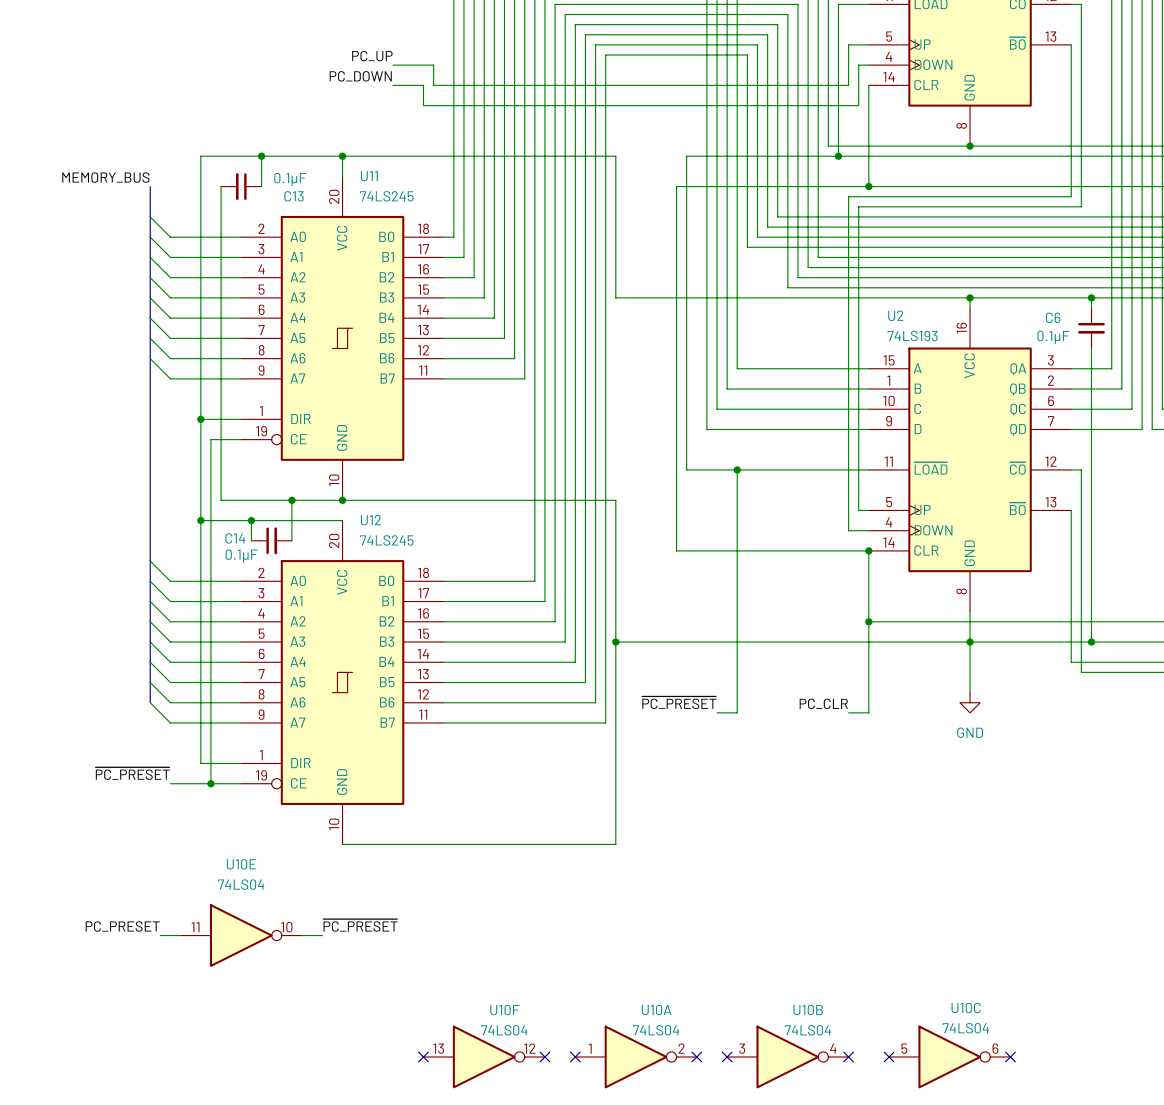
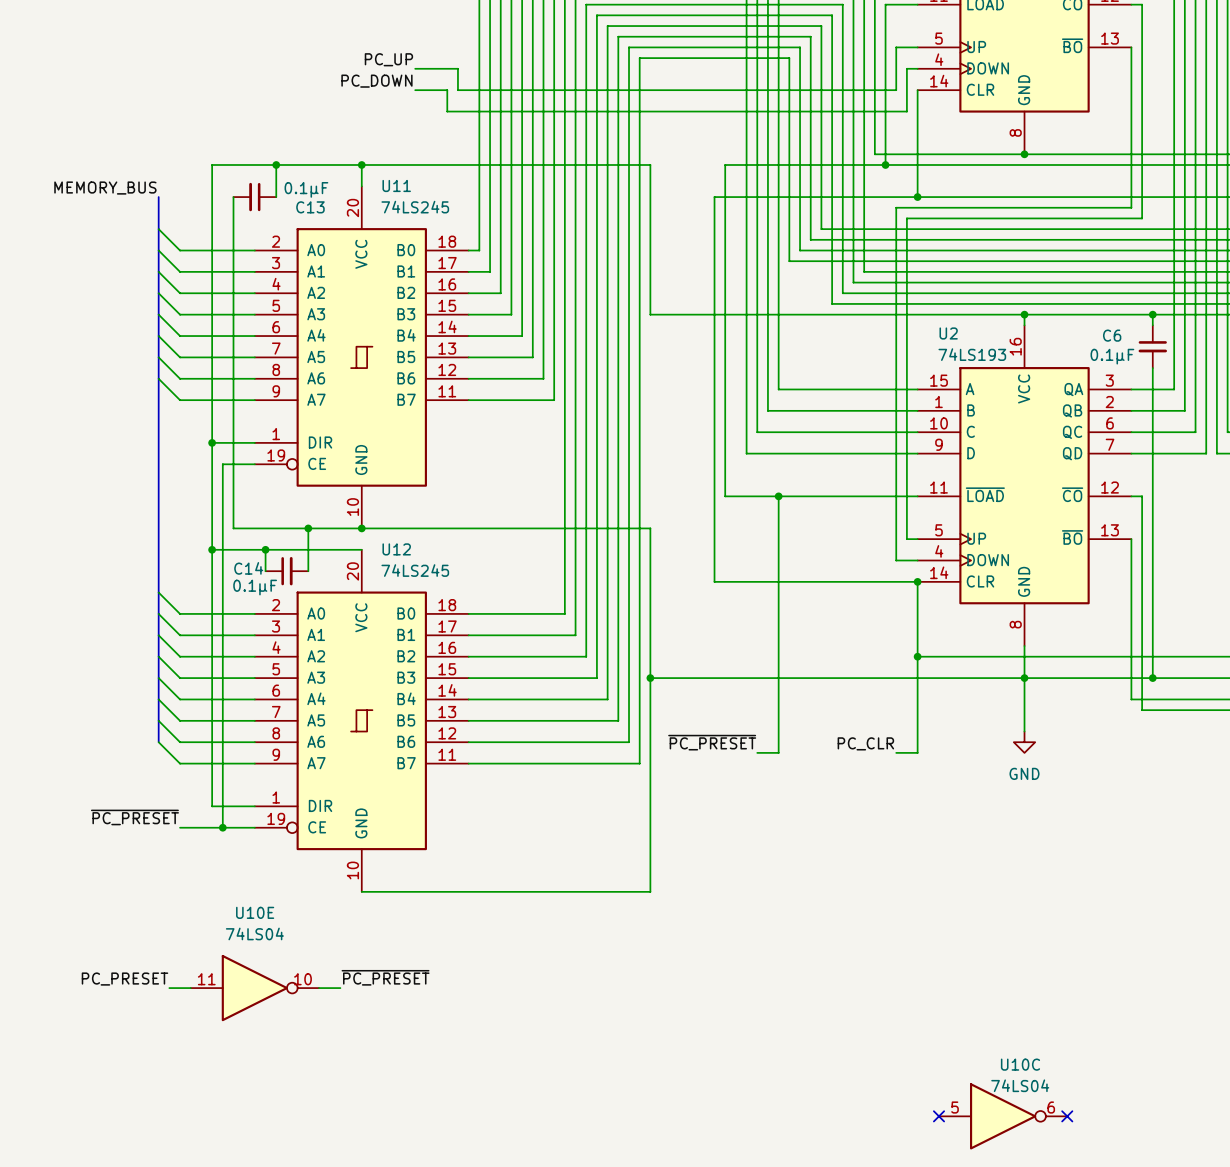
no-connect mark: (423, 1056) -> none
U10F: 74LS04 (484, 1056) -> none
no-connect mark: (544, 1056) -> none
no-connect mark: (575, 1056) -> none
U10A: 74LS04 (636, 1056) -> none
no-connect mark: (696, 1056) -> none
no-connect mark: (727, 1056) -> none
U10B: 74LS04 (787, 1056) -> none
no-connect mark: (848, 1056) -> none

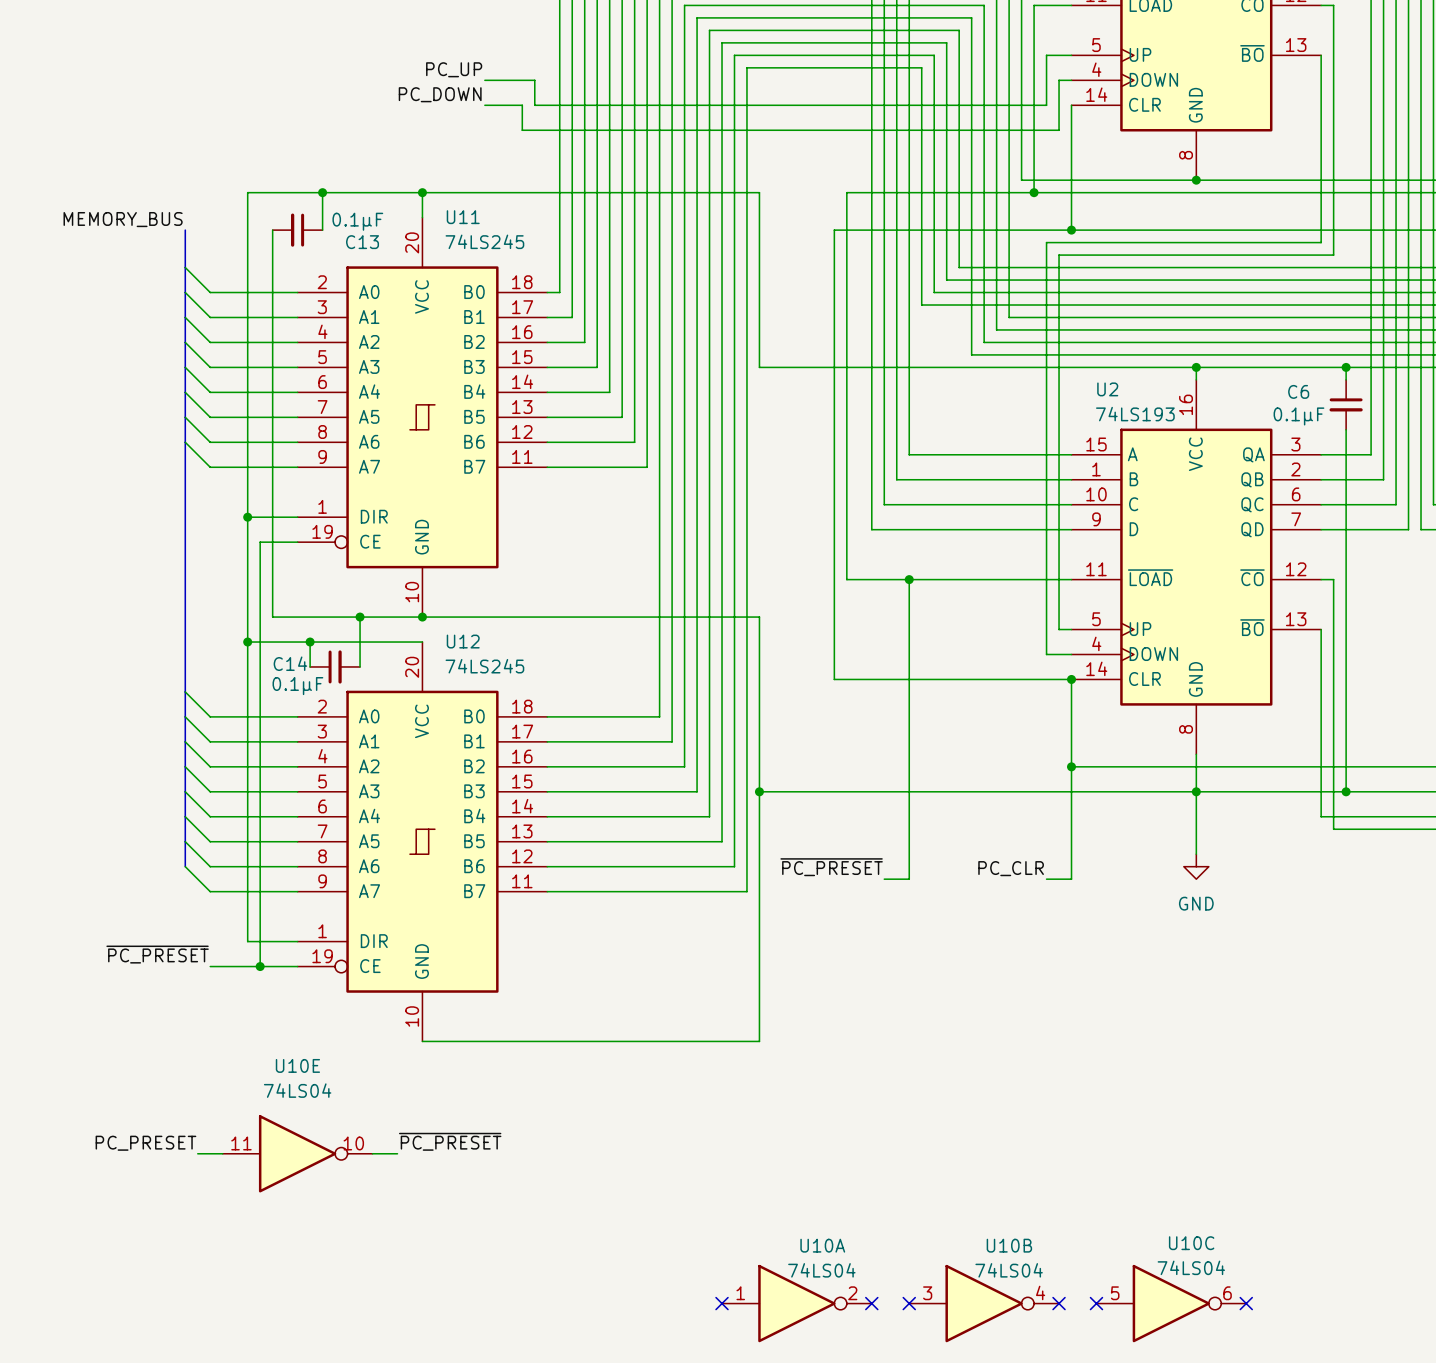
no-connect mark: none -> (722, 1303)
U10A: none -> 74LS04 (796, 1303)
no-connect mark: none -> (871, 1303)
no-connect mark: none -> (909, 1303)
U10B: none -> 74LS04 (984, 1303)
no-connect mark: none -> (1059, 1303)

